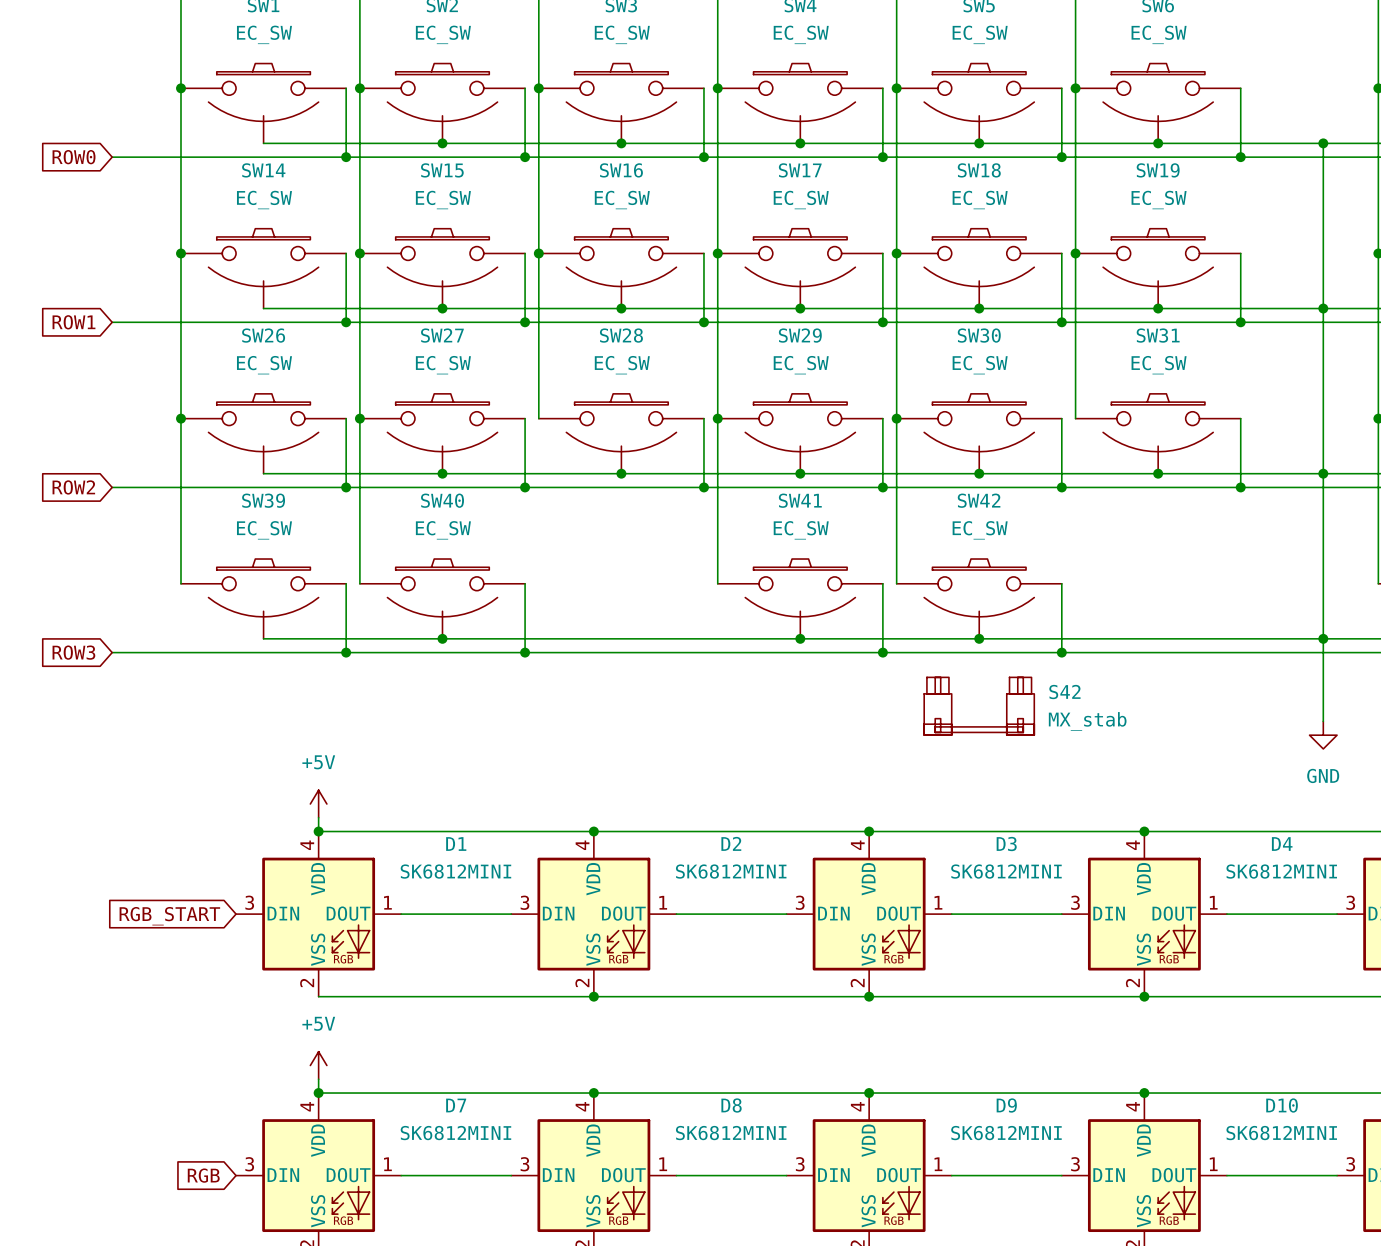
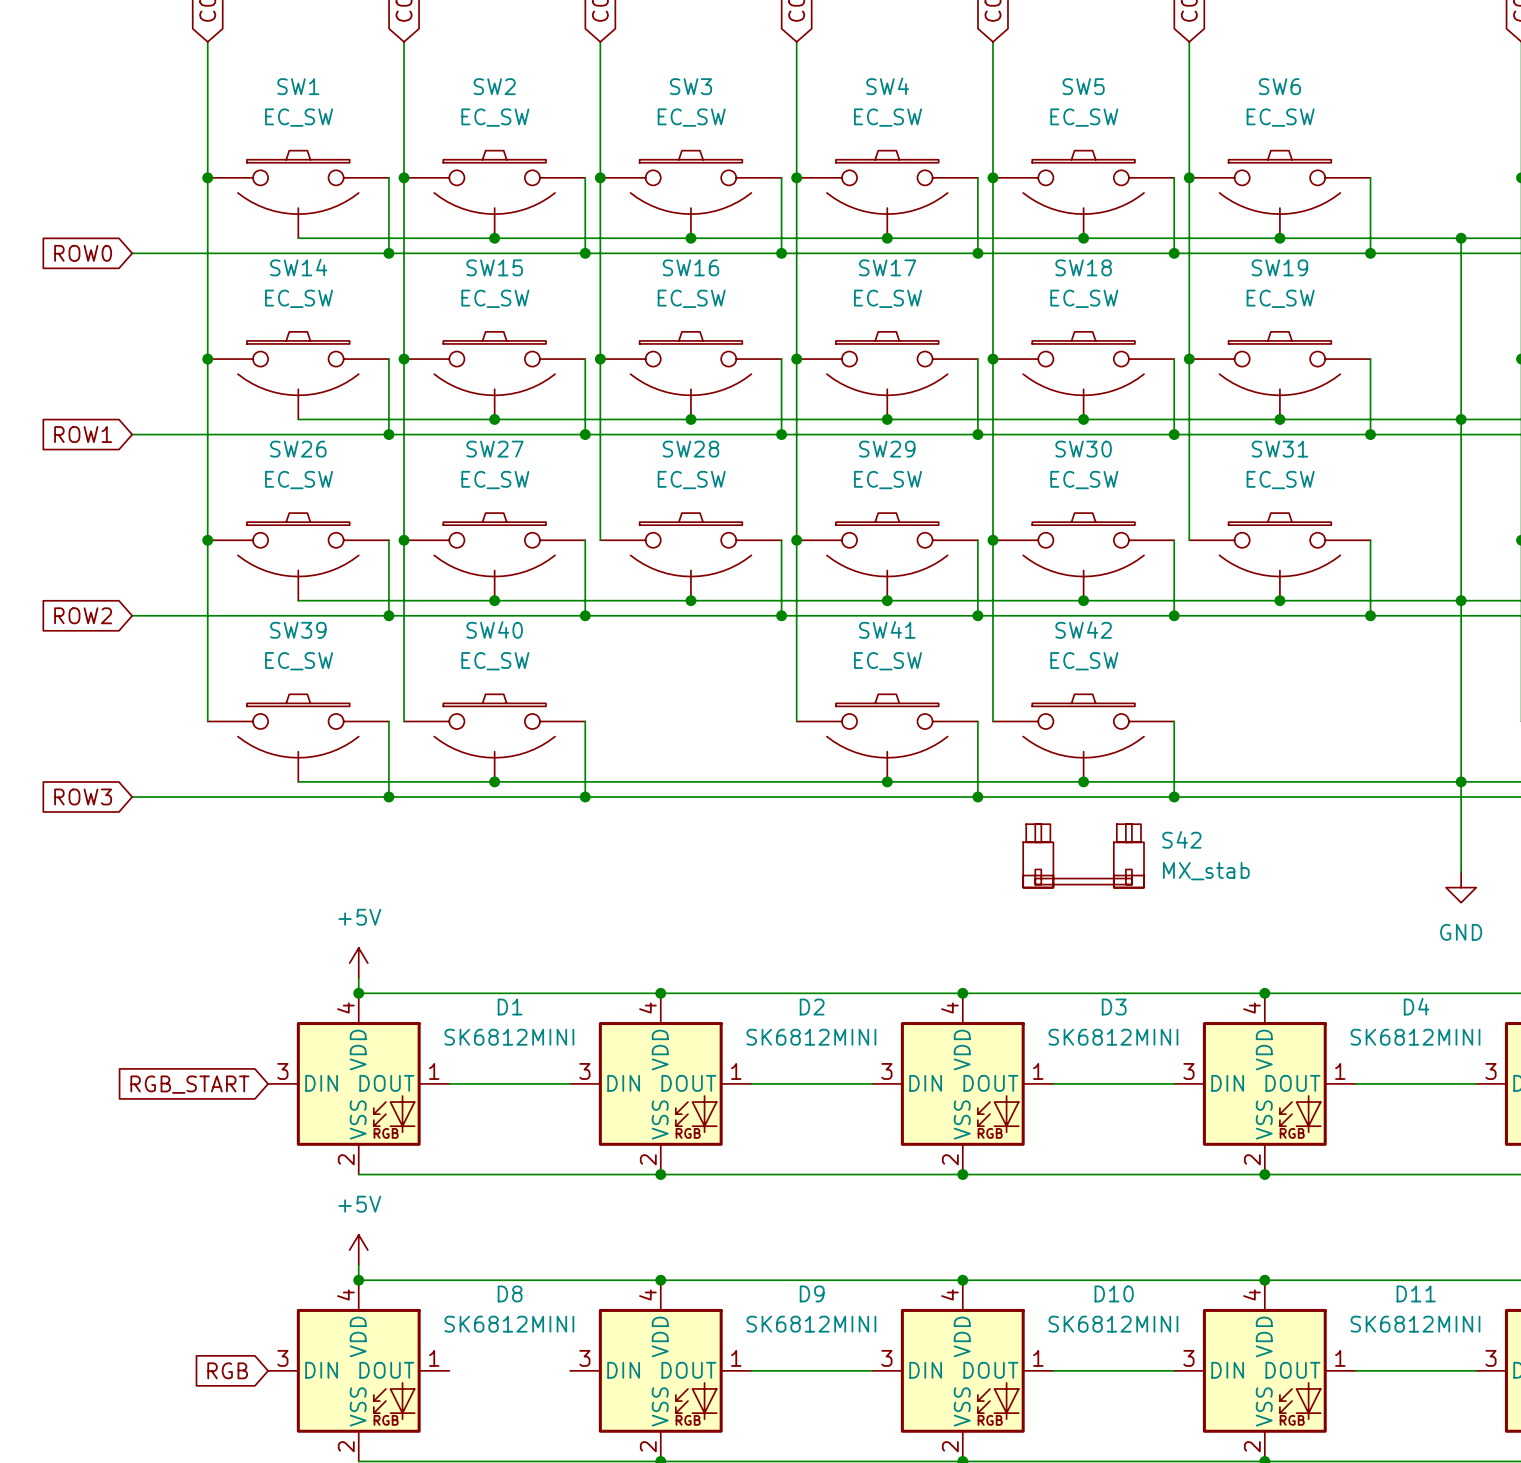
D7 name: D7 (456, 1105) -> D8 (510, 1293)
D8 name: D8 (731, 1105) -> D9 (812, 1293)
D9 name: D9 (1006, 1105) -> D10 (1114, 1293)
D10 name: D10 (1282, 1105) -> D11 (1416, 1293)
wire: (401, 1175) (511, 1175) -> none

